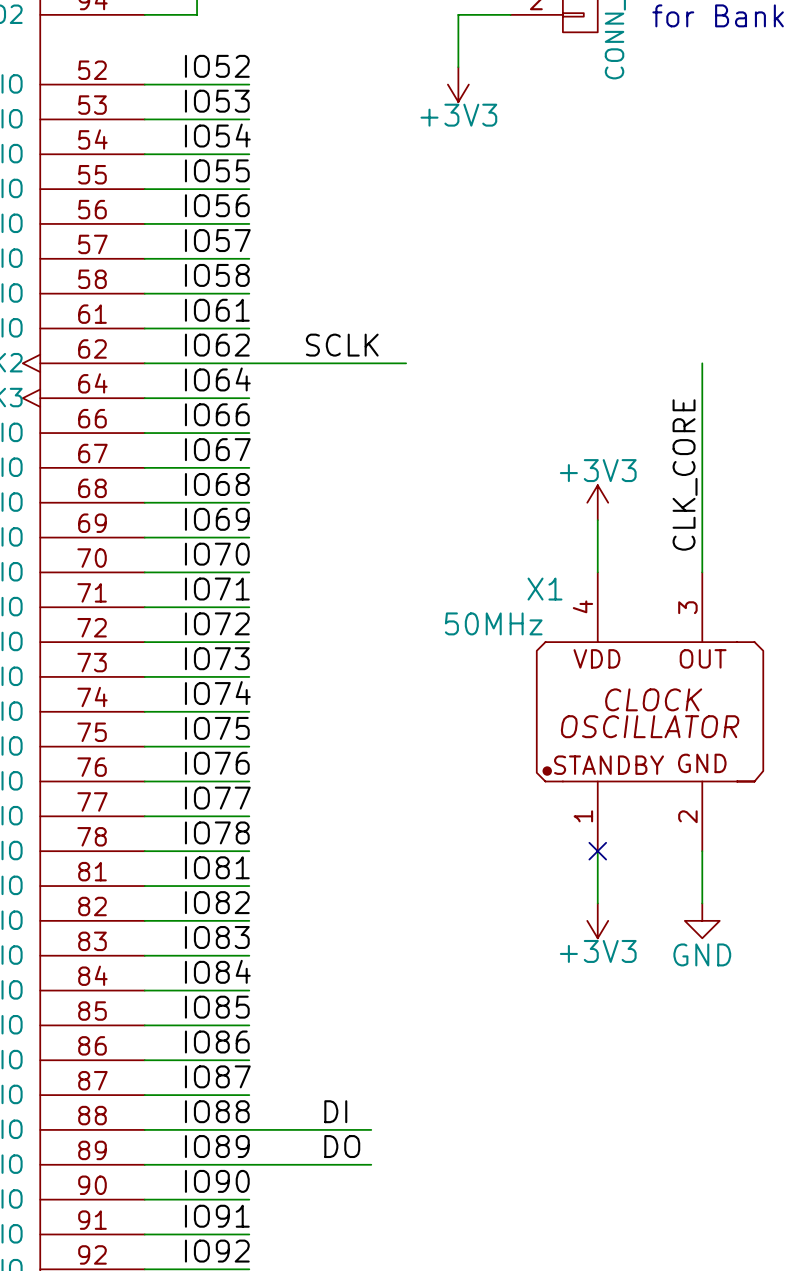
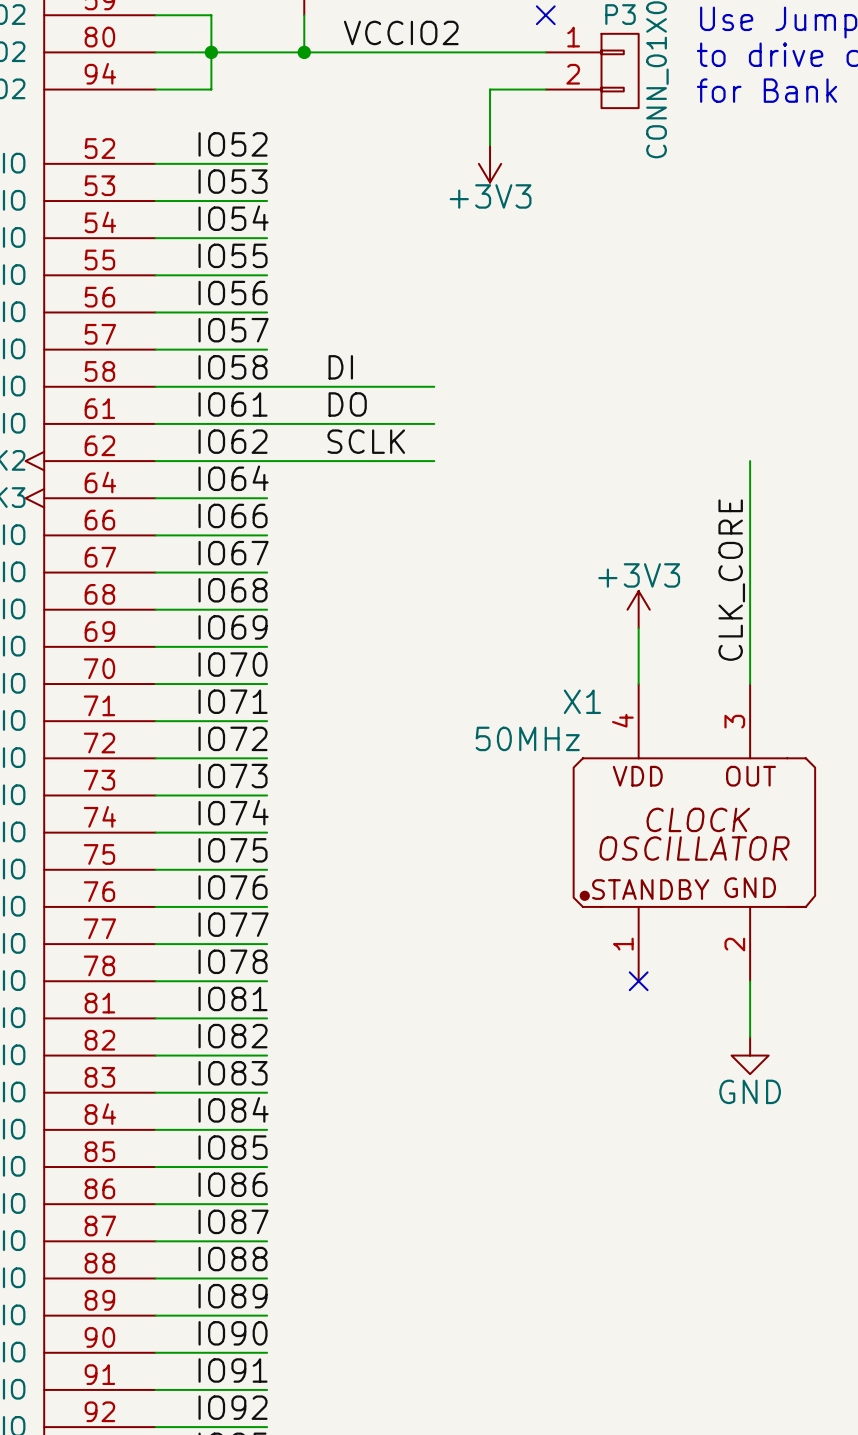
label: none -> DI (340, 367)
wire: none -> (267, 386) (434, 386)
label: none -> DO (347, 404)
wire: none -> (267, 423) (434, 423)
wire: (597, 851) (597, 903) -> none
power symbol: +3V3 (597, 920) -> none
label: DI (335, 1111) -> none
wire: (249, 1129) (371, 1129) -> none
label: DO (342, 1146) -> none
wire: (249, 1164) (371, 1164) -> none

